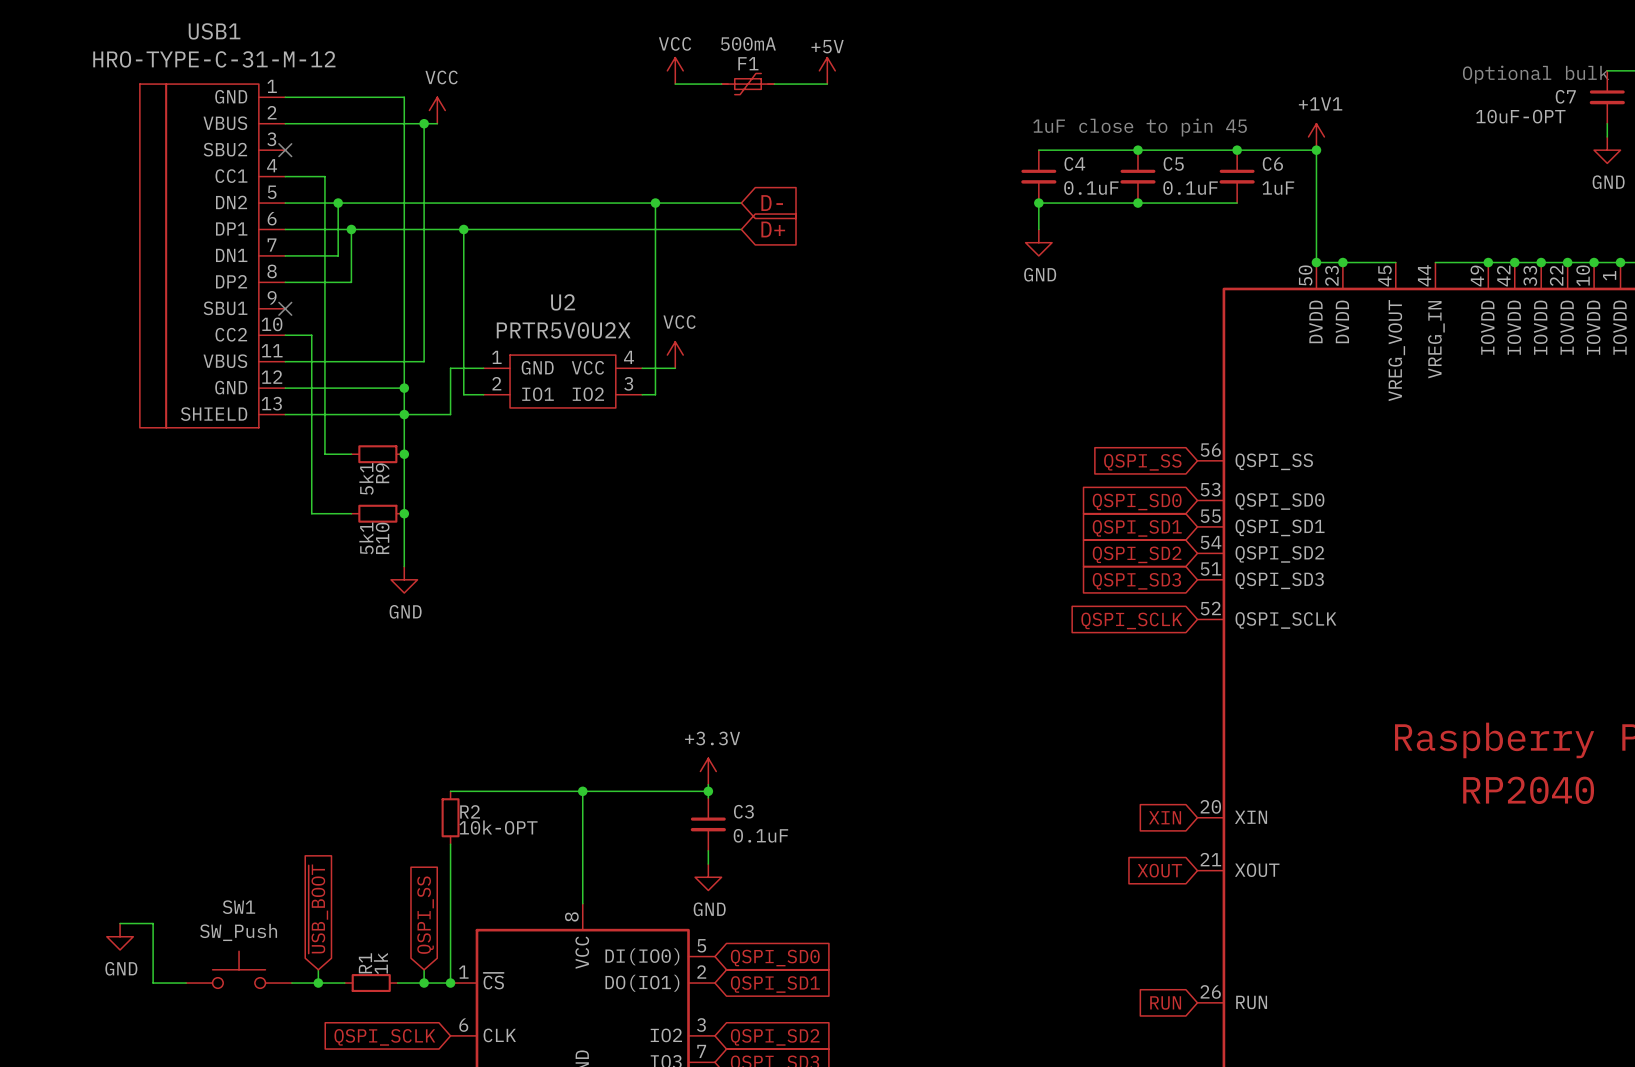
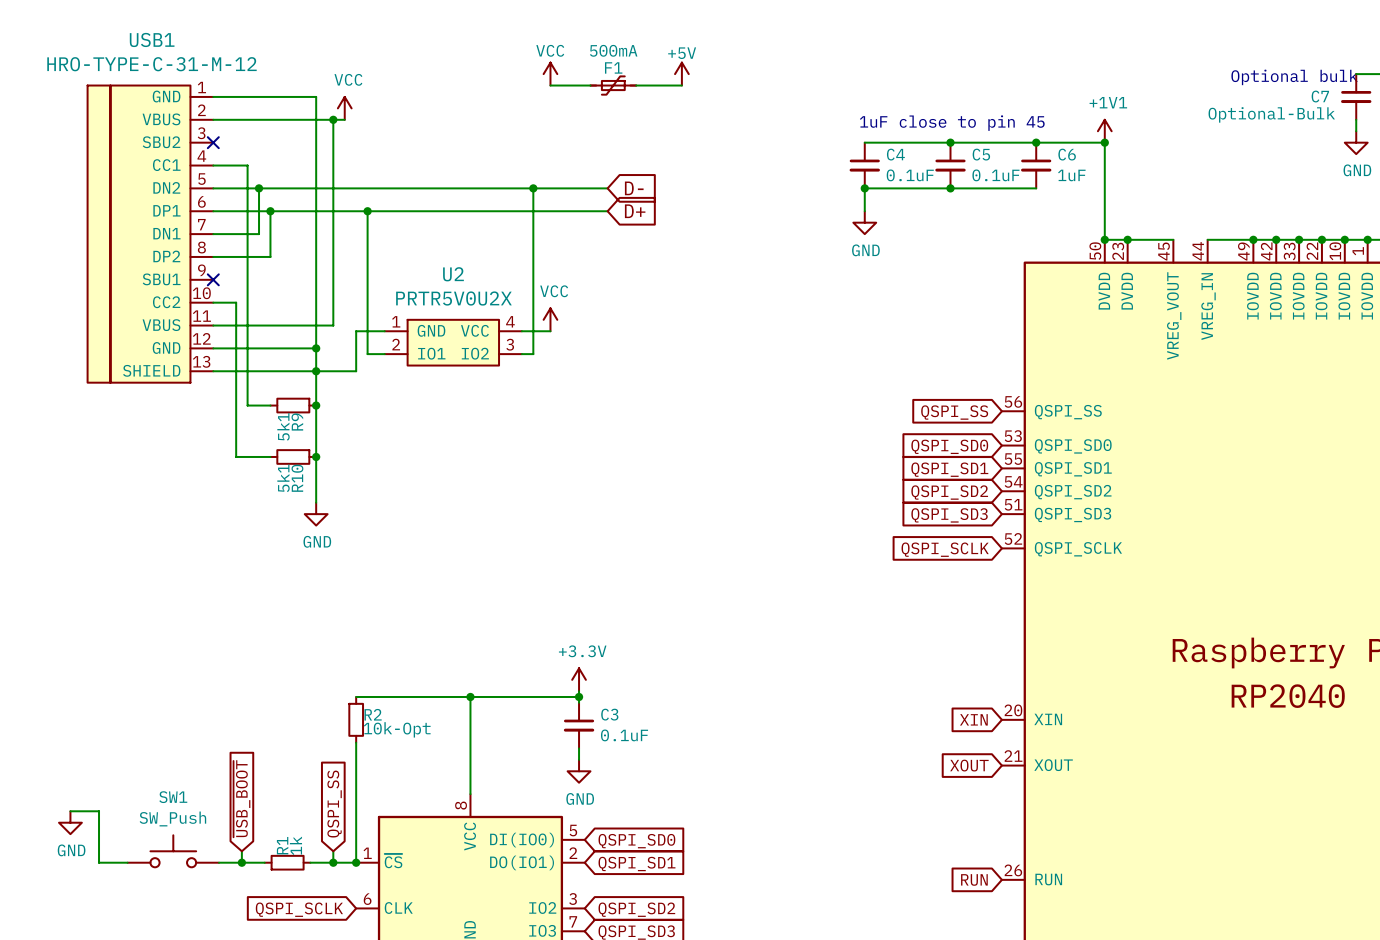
C7 value: 10uF-OPT (1520, 116) -> Optional-Bulk (1271, 114)
R2 value: 10k-OPT (498, 827) -> 10k-Opt (397, 729)

